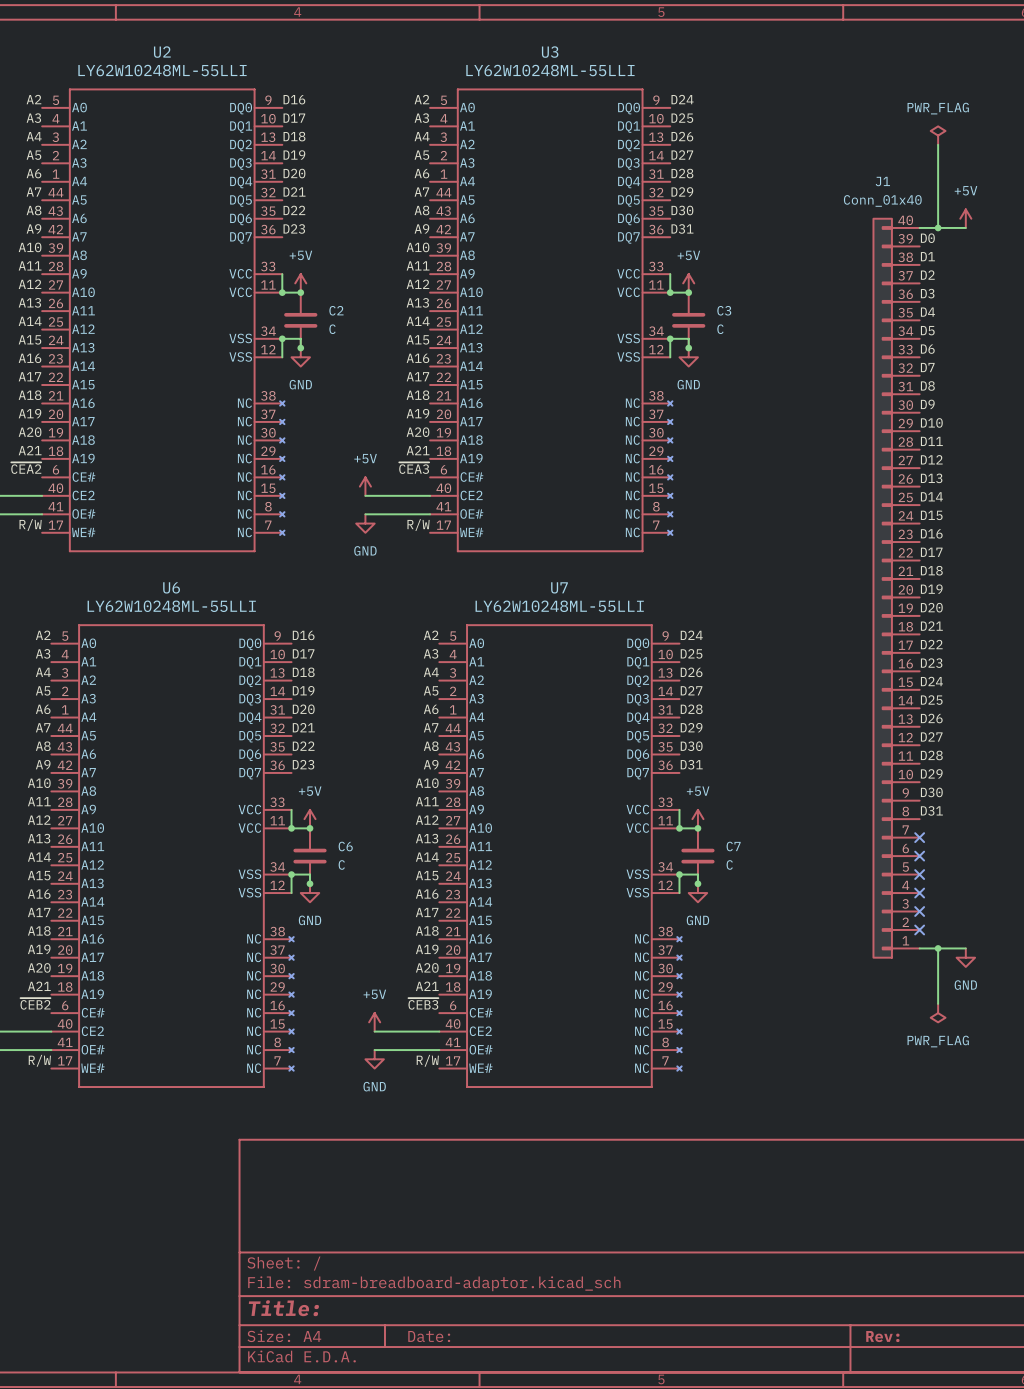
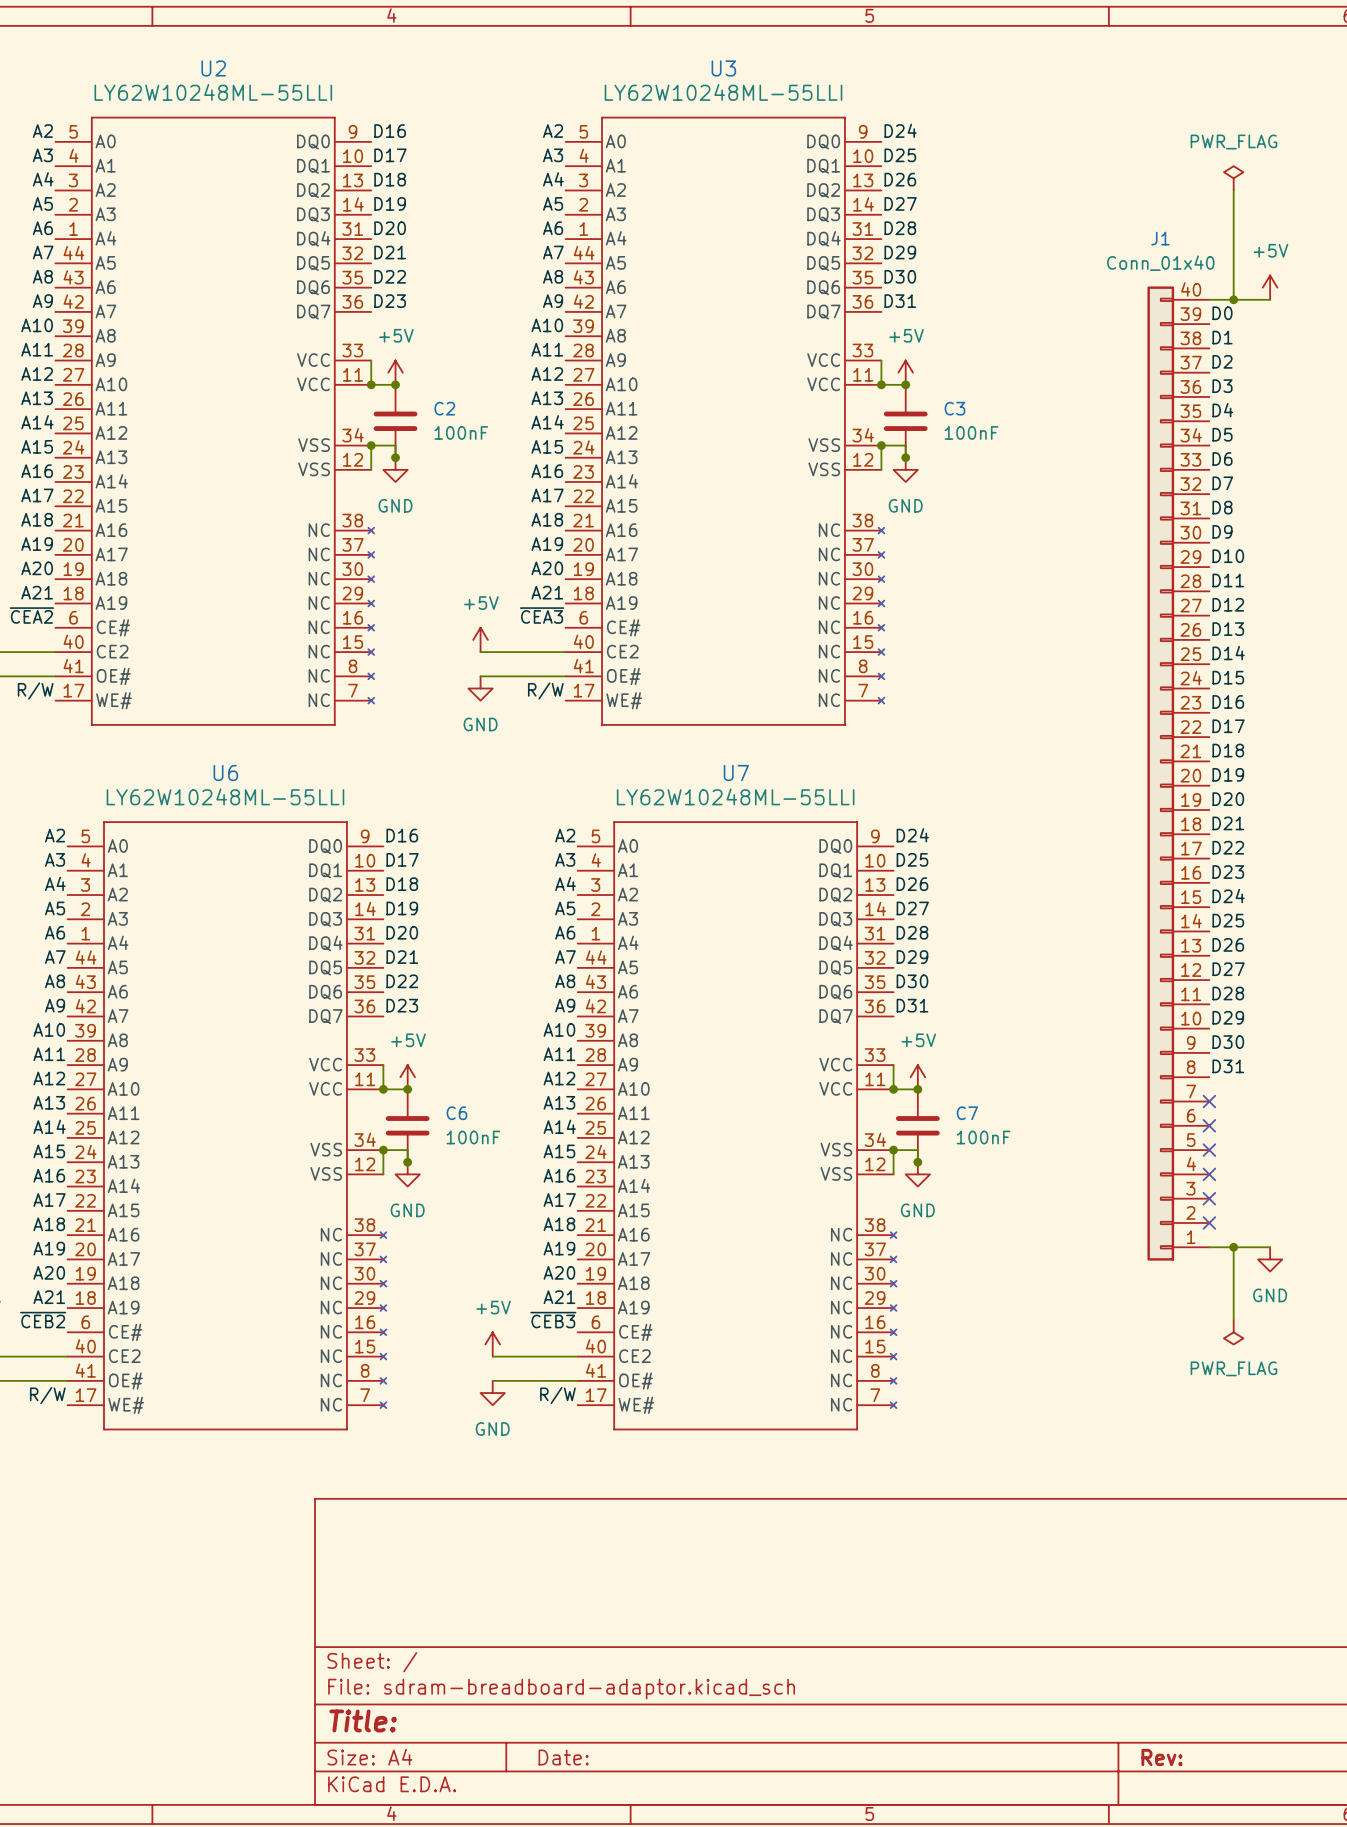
C2 value: C (332, 329) -> 100nF (461, 432)
C3 value: C (720, 329) -> 100nF (971, 432)
C6 value: C (341, 864) -> 100nF (473, 1137)
C7 value: C (729, 864) -> 100nF (983, 1137)

